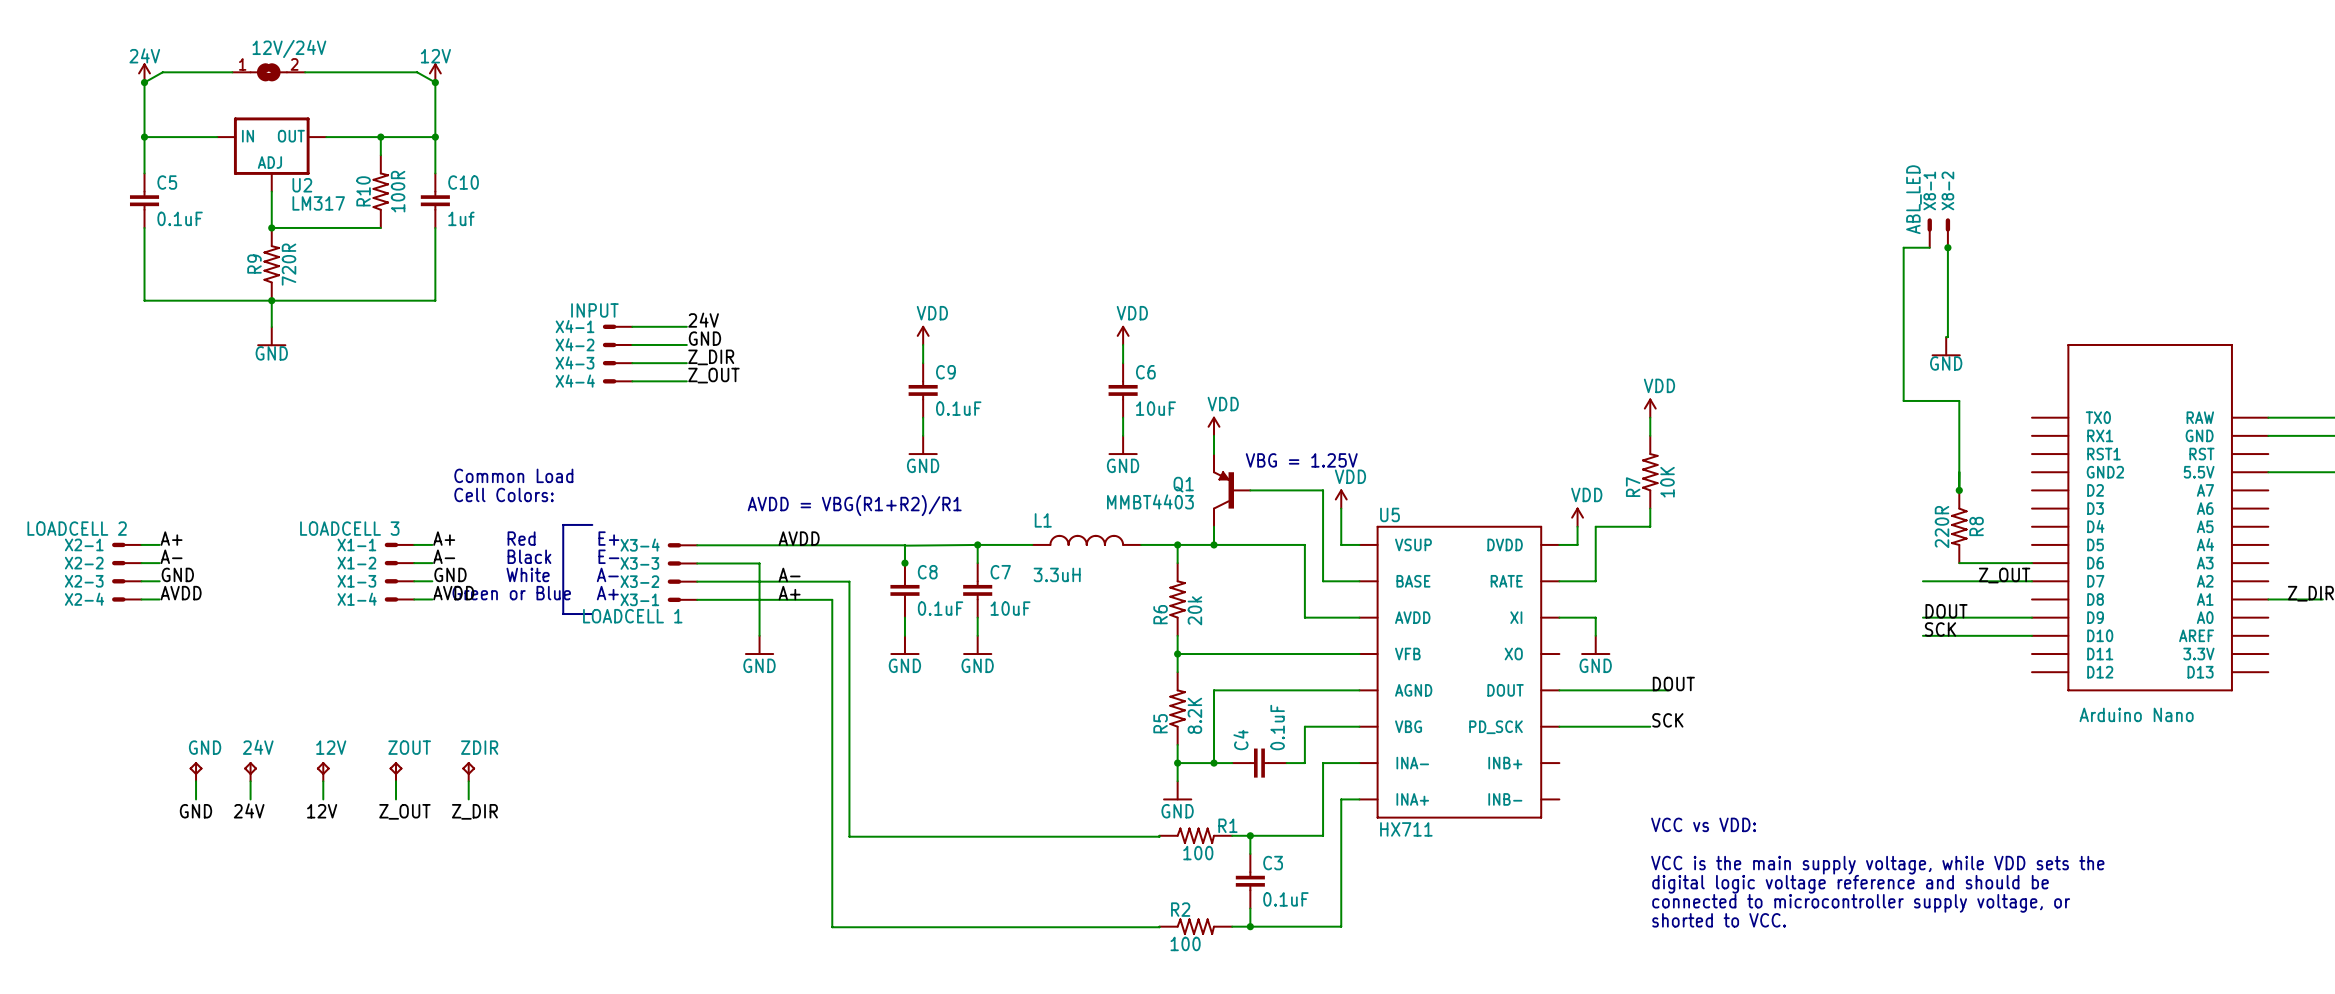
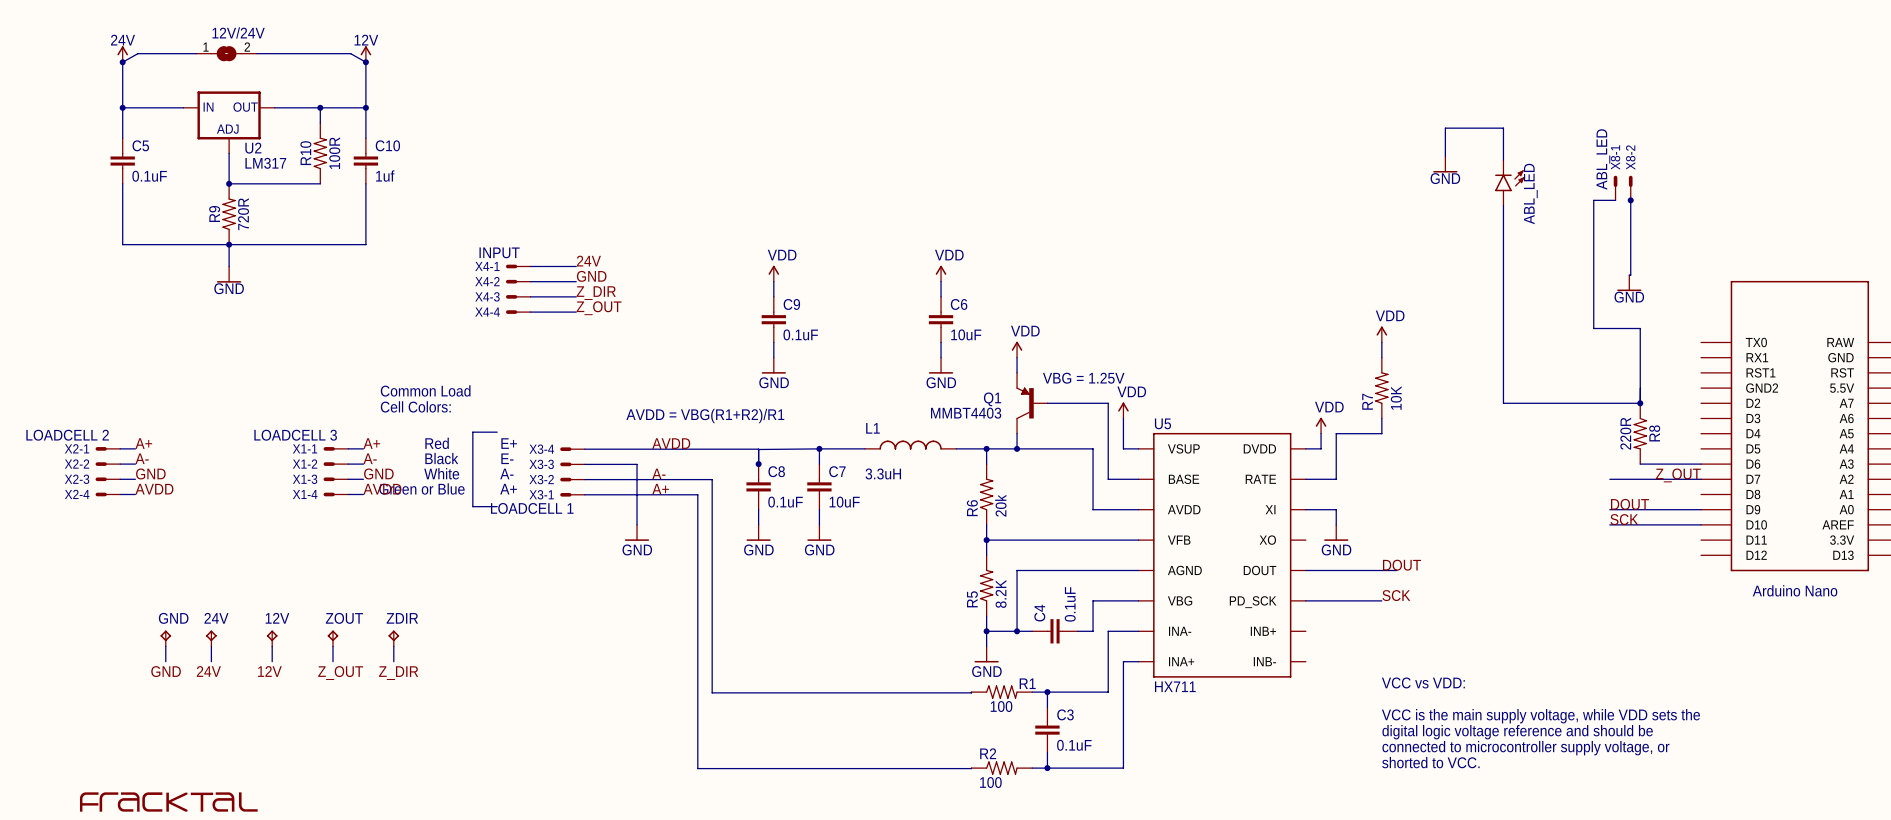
wire: none -> (1445, 156) (1445, 128) (1503, 128) (1503, 160)
power symbol: none -> GND (1445, 164)
ABL_LED: none -> (1509, 182)
wire: none -> (1503, 205) (1503, 403) (1640, 403)
part: none -> (168, 802)

